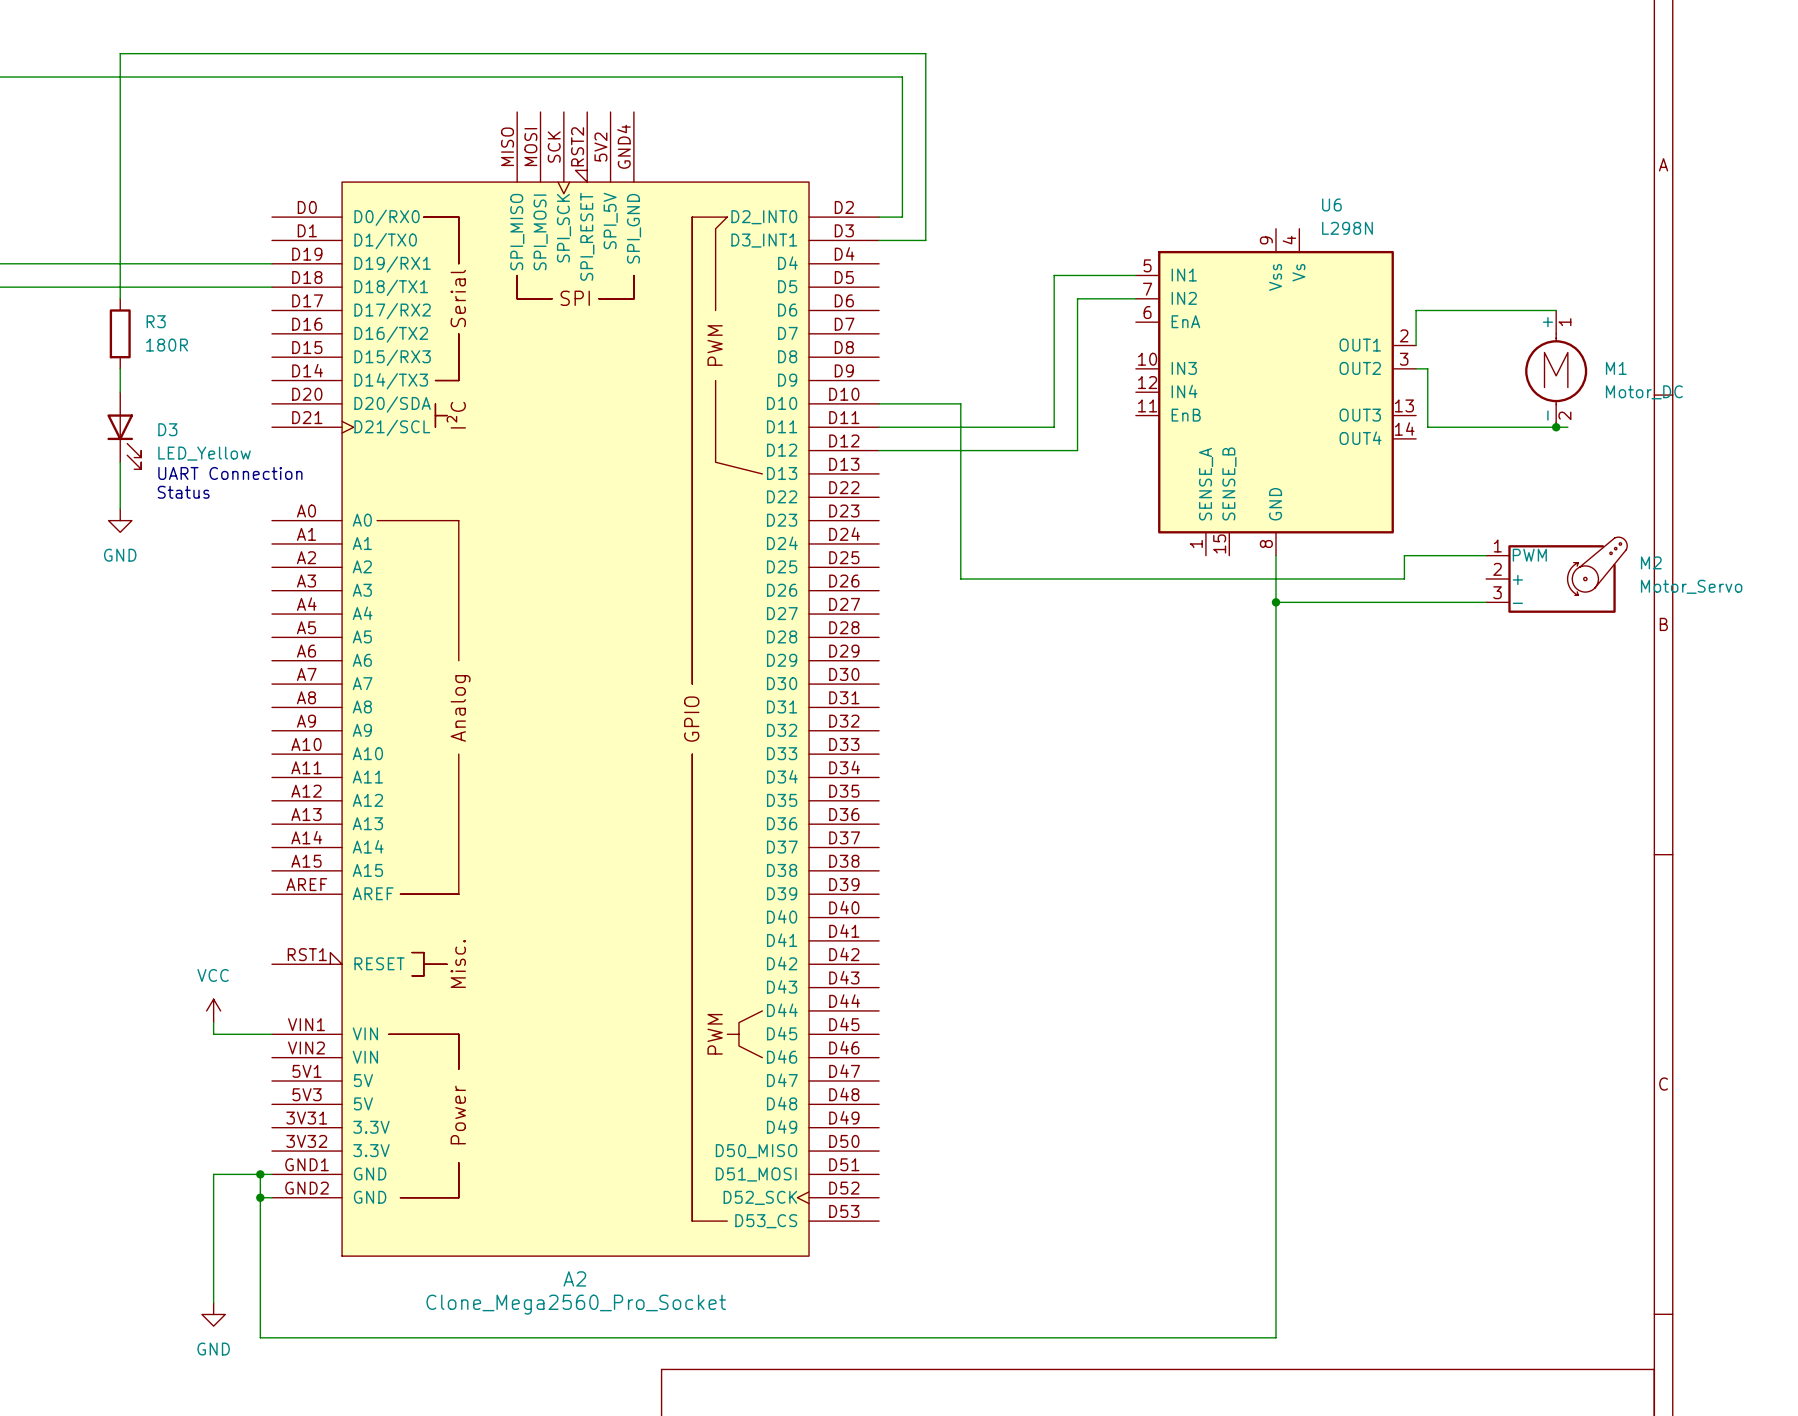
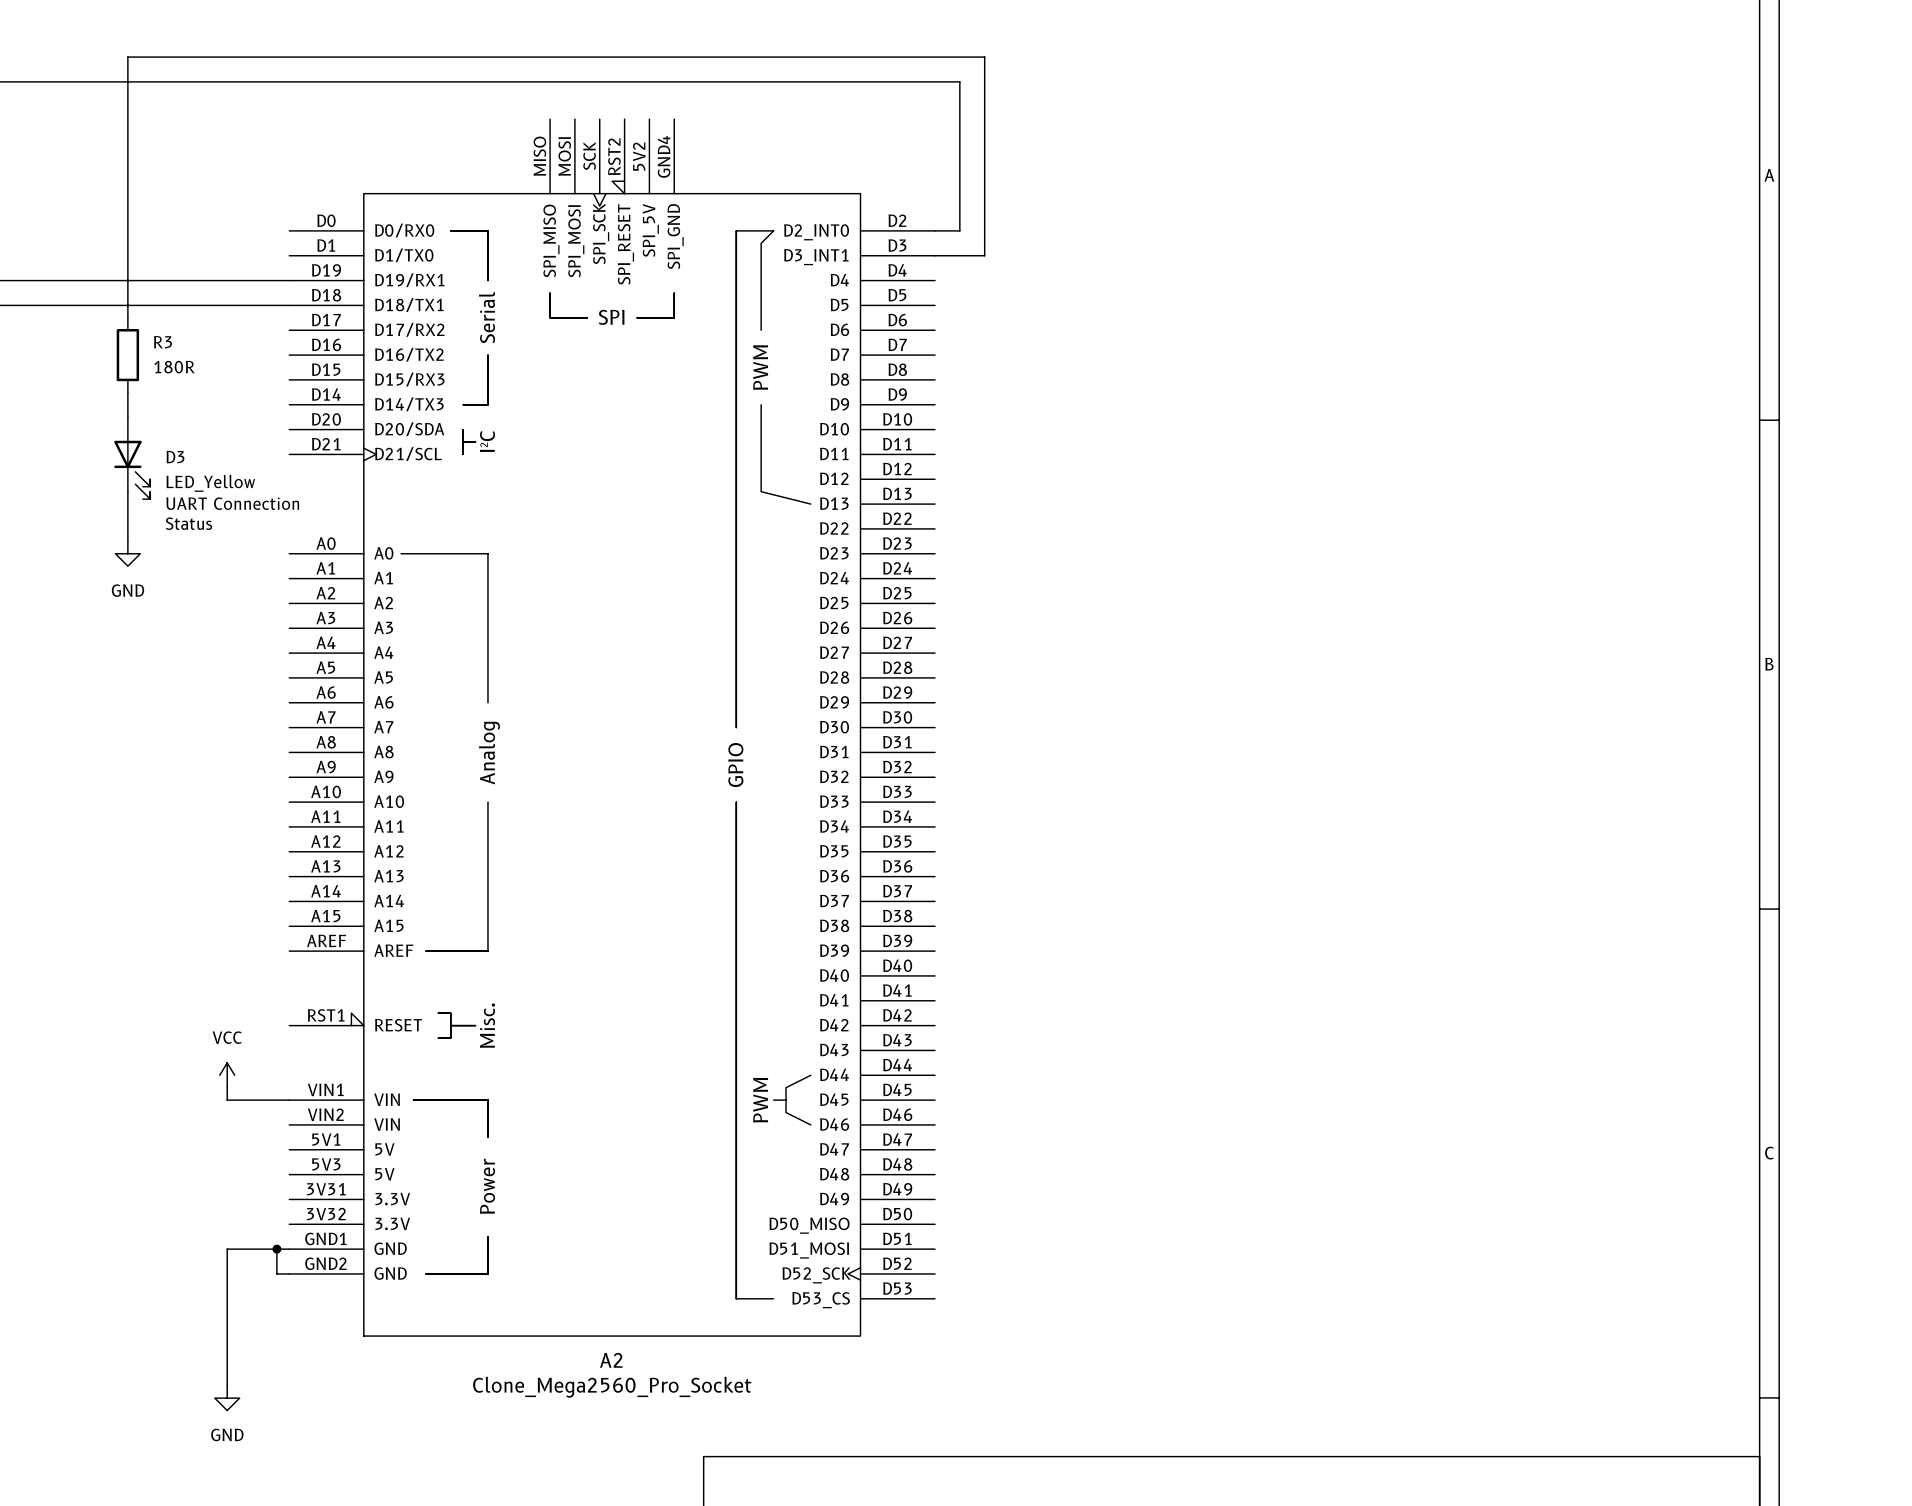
wire: (1135, 275) (1054, 275) (1054, 427) (879, 427) -> none
wire: (1135, 298) (1077, 298) (1077, 450) (879, 450) -> none
wire: (1556, 310) (1416, 310) (1416, 345) -> none
wire: (1416, 368) (1427, 368) (1427, 427) (1567, 427) -> none
M1: Motor_DC (1556, 368) -> none
U6: L298N (1275, 392) -> none
wire: (879, 403) (960, 403) (960, 579) (1404, 579) (1404, 555) (1486, 555) -> none
junction: (1556, 427) -> none
wire: (1275, 555) (1275, 1337) (260, 1337) (260, 1197) -> none
M2: Motor_Servo (1556, 575) -> none
wire: (1275, 602) (1486, 602) -> none
junction: (1275, 602) -> none
junction: (260, 1197) -> none

